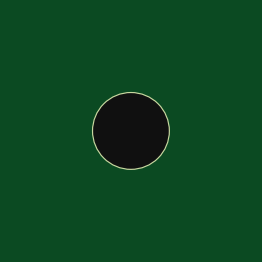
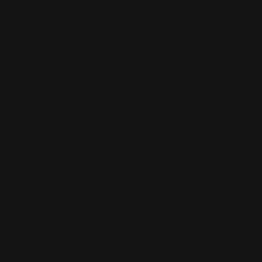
part: (130, 130) -> none

